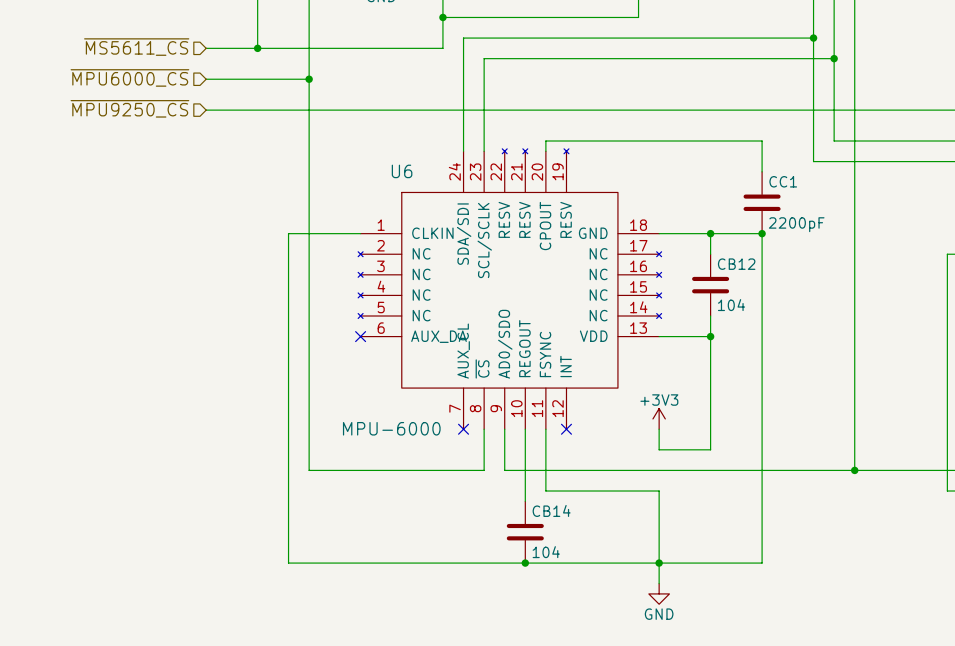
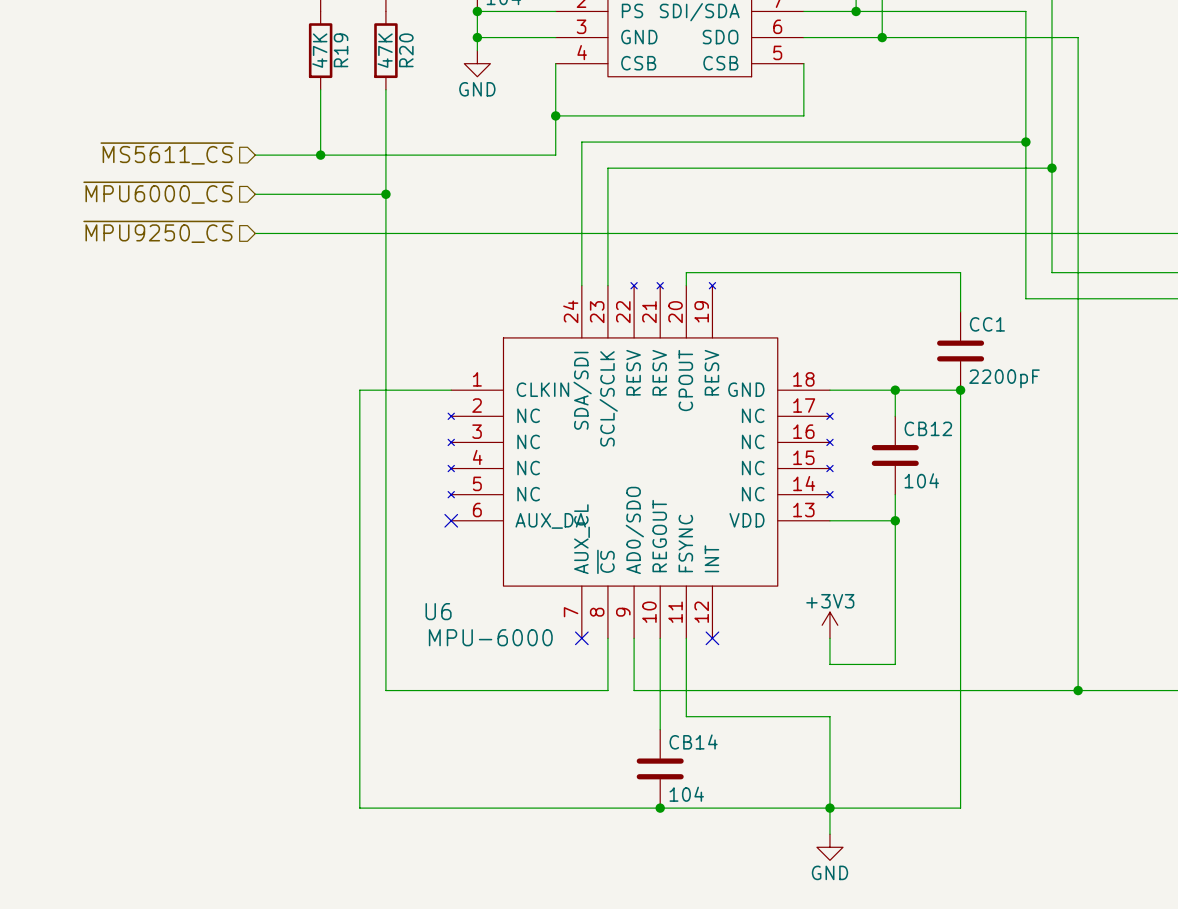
U6 name position: U6 (402, 171) -> U6 (438, 611)

